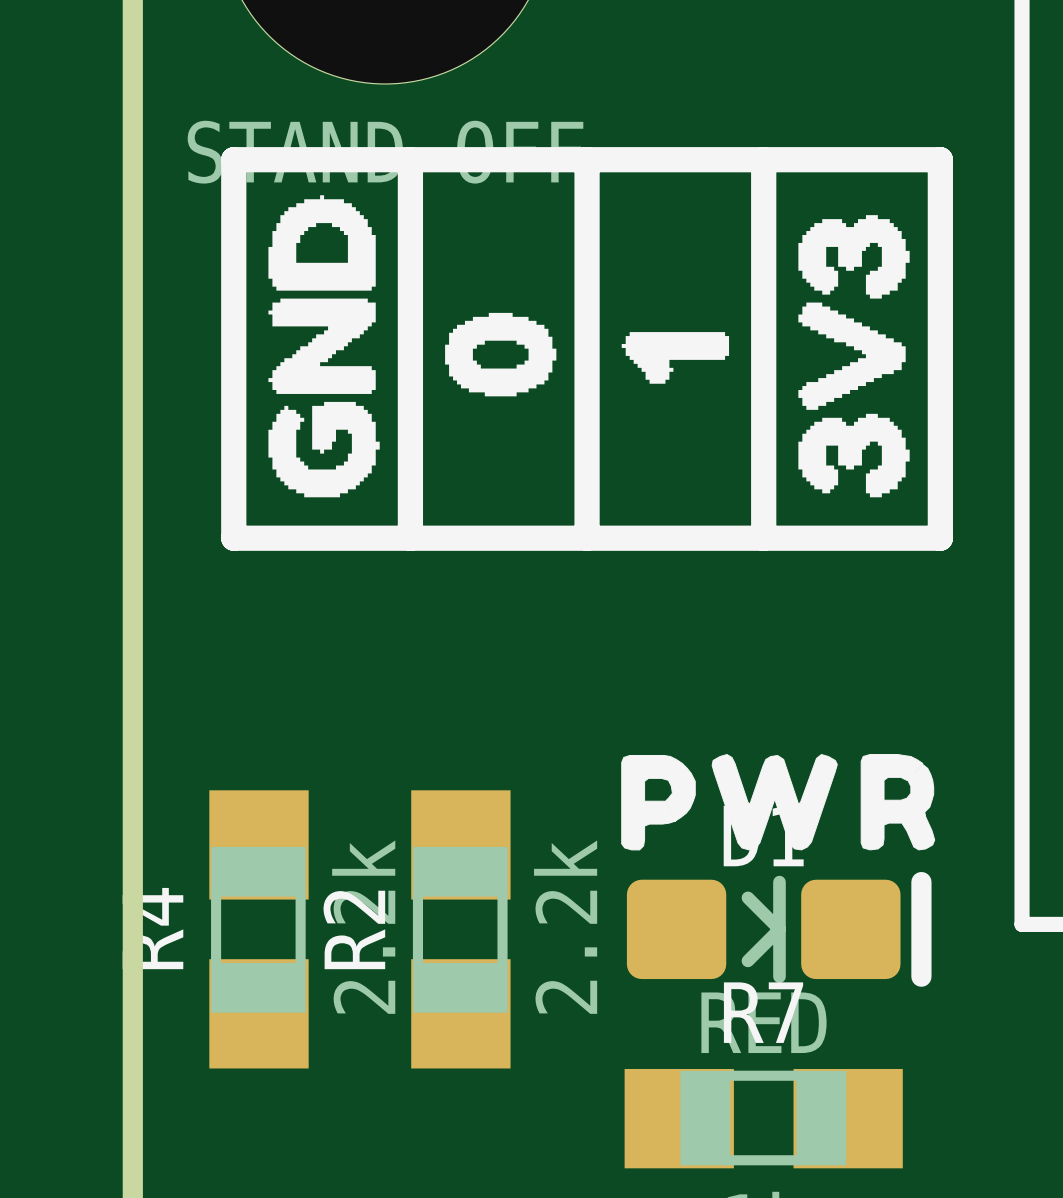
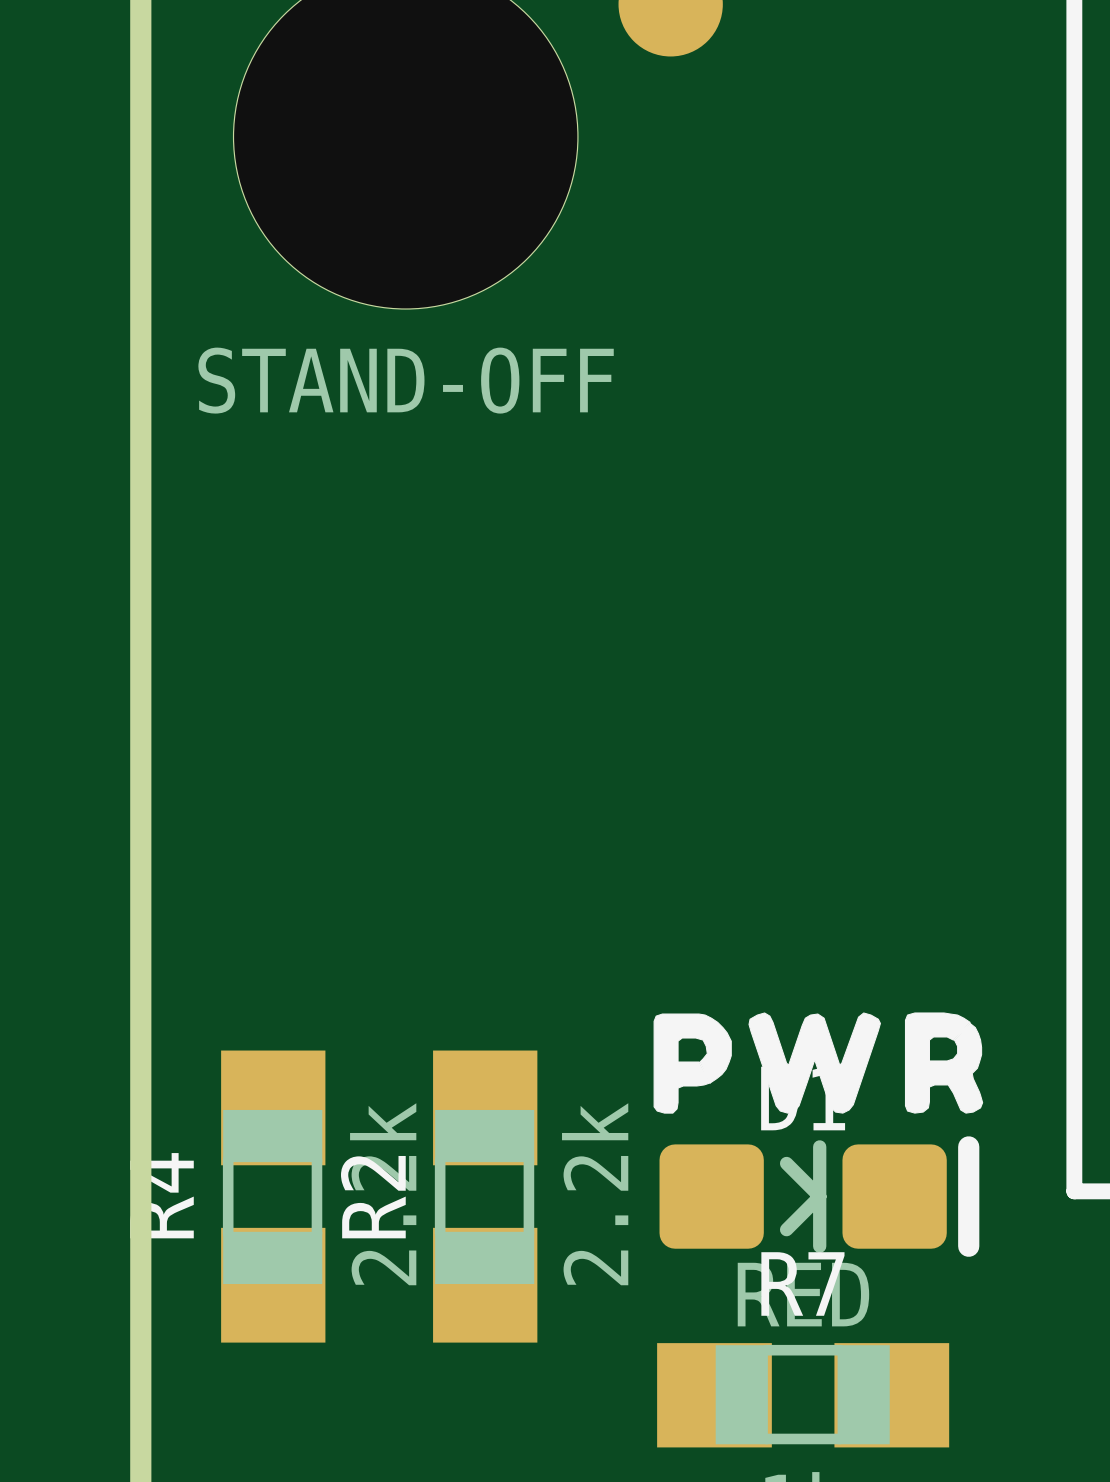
line: (233, 159) (940, 159) (940, 538) (233, 538) (233, 159) -> none
line: (410, 159) (410, 538) -> none
line: (587, 159) (587, 538) -> none
line: (763, 159) (763, 538) -> none
drawing: [268, 195, 910, 498] -> none

